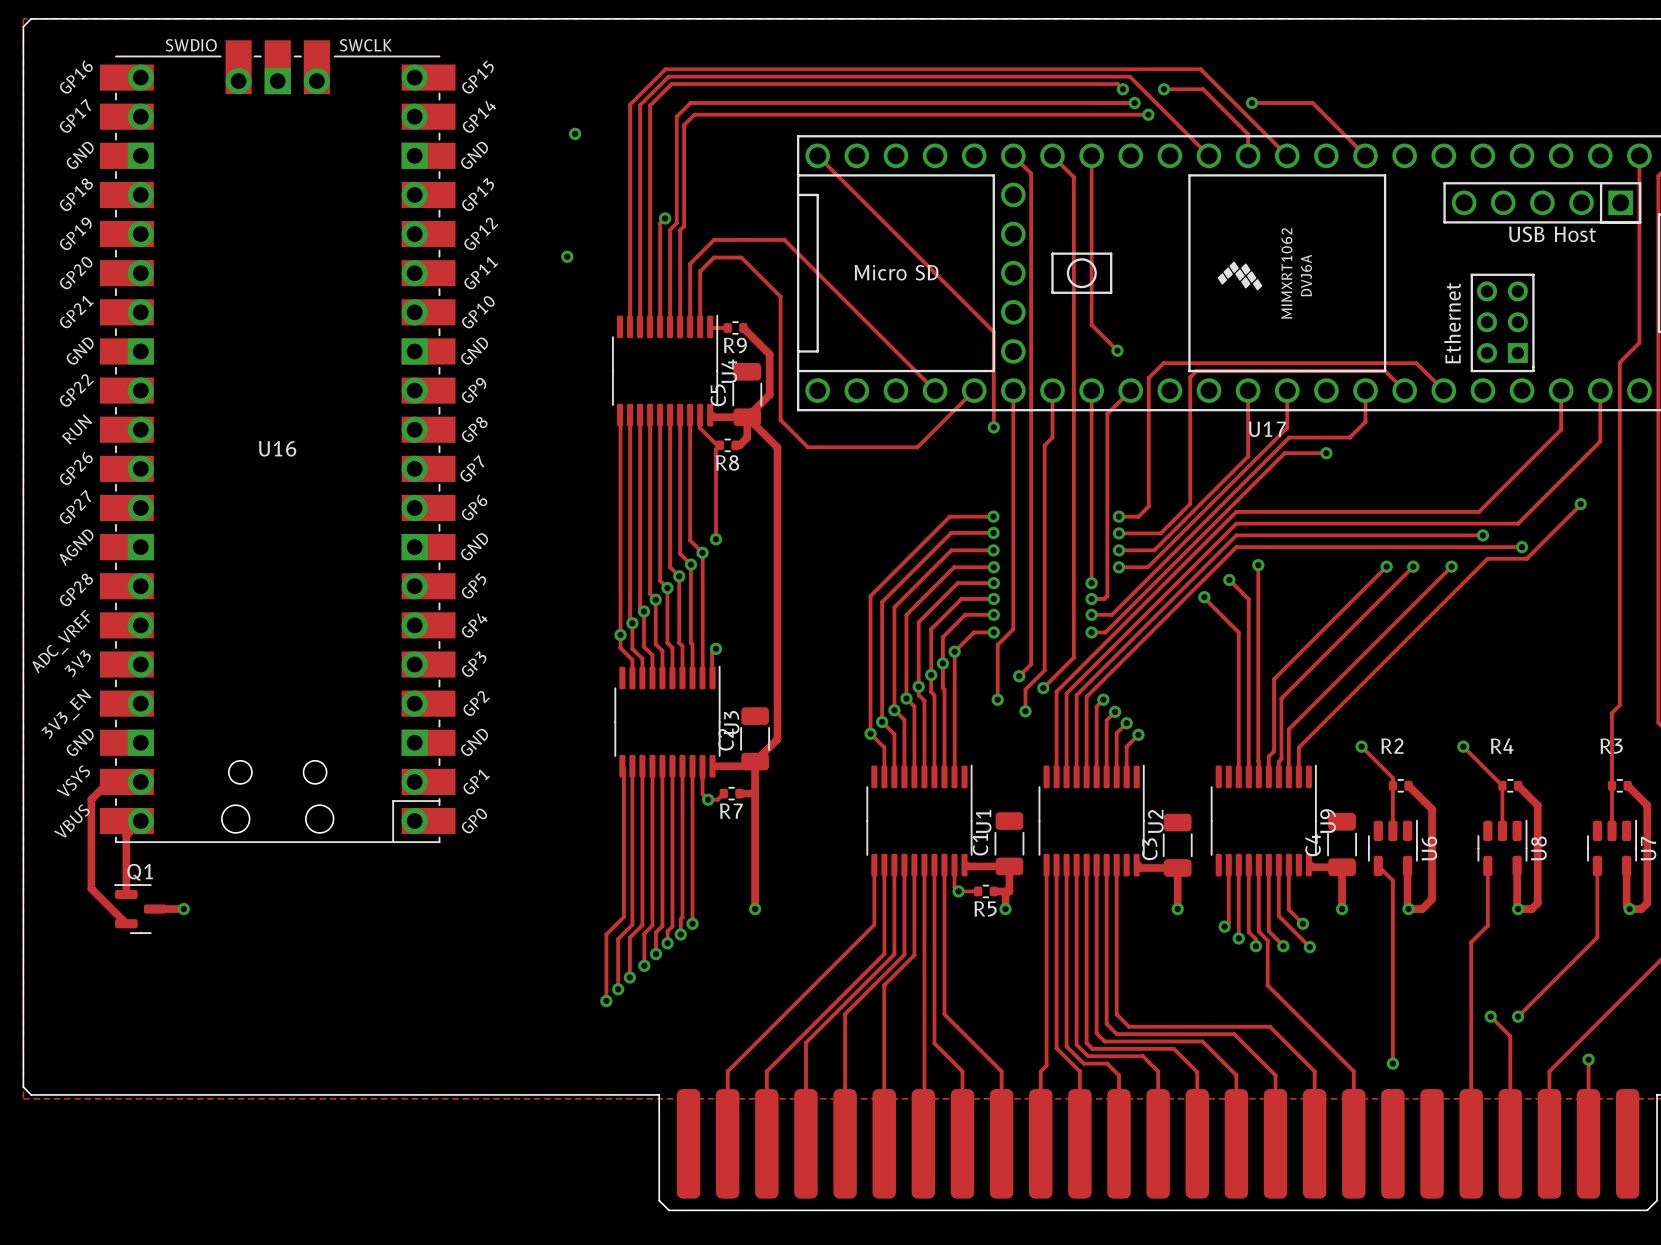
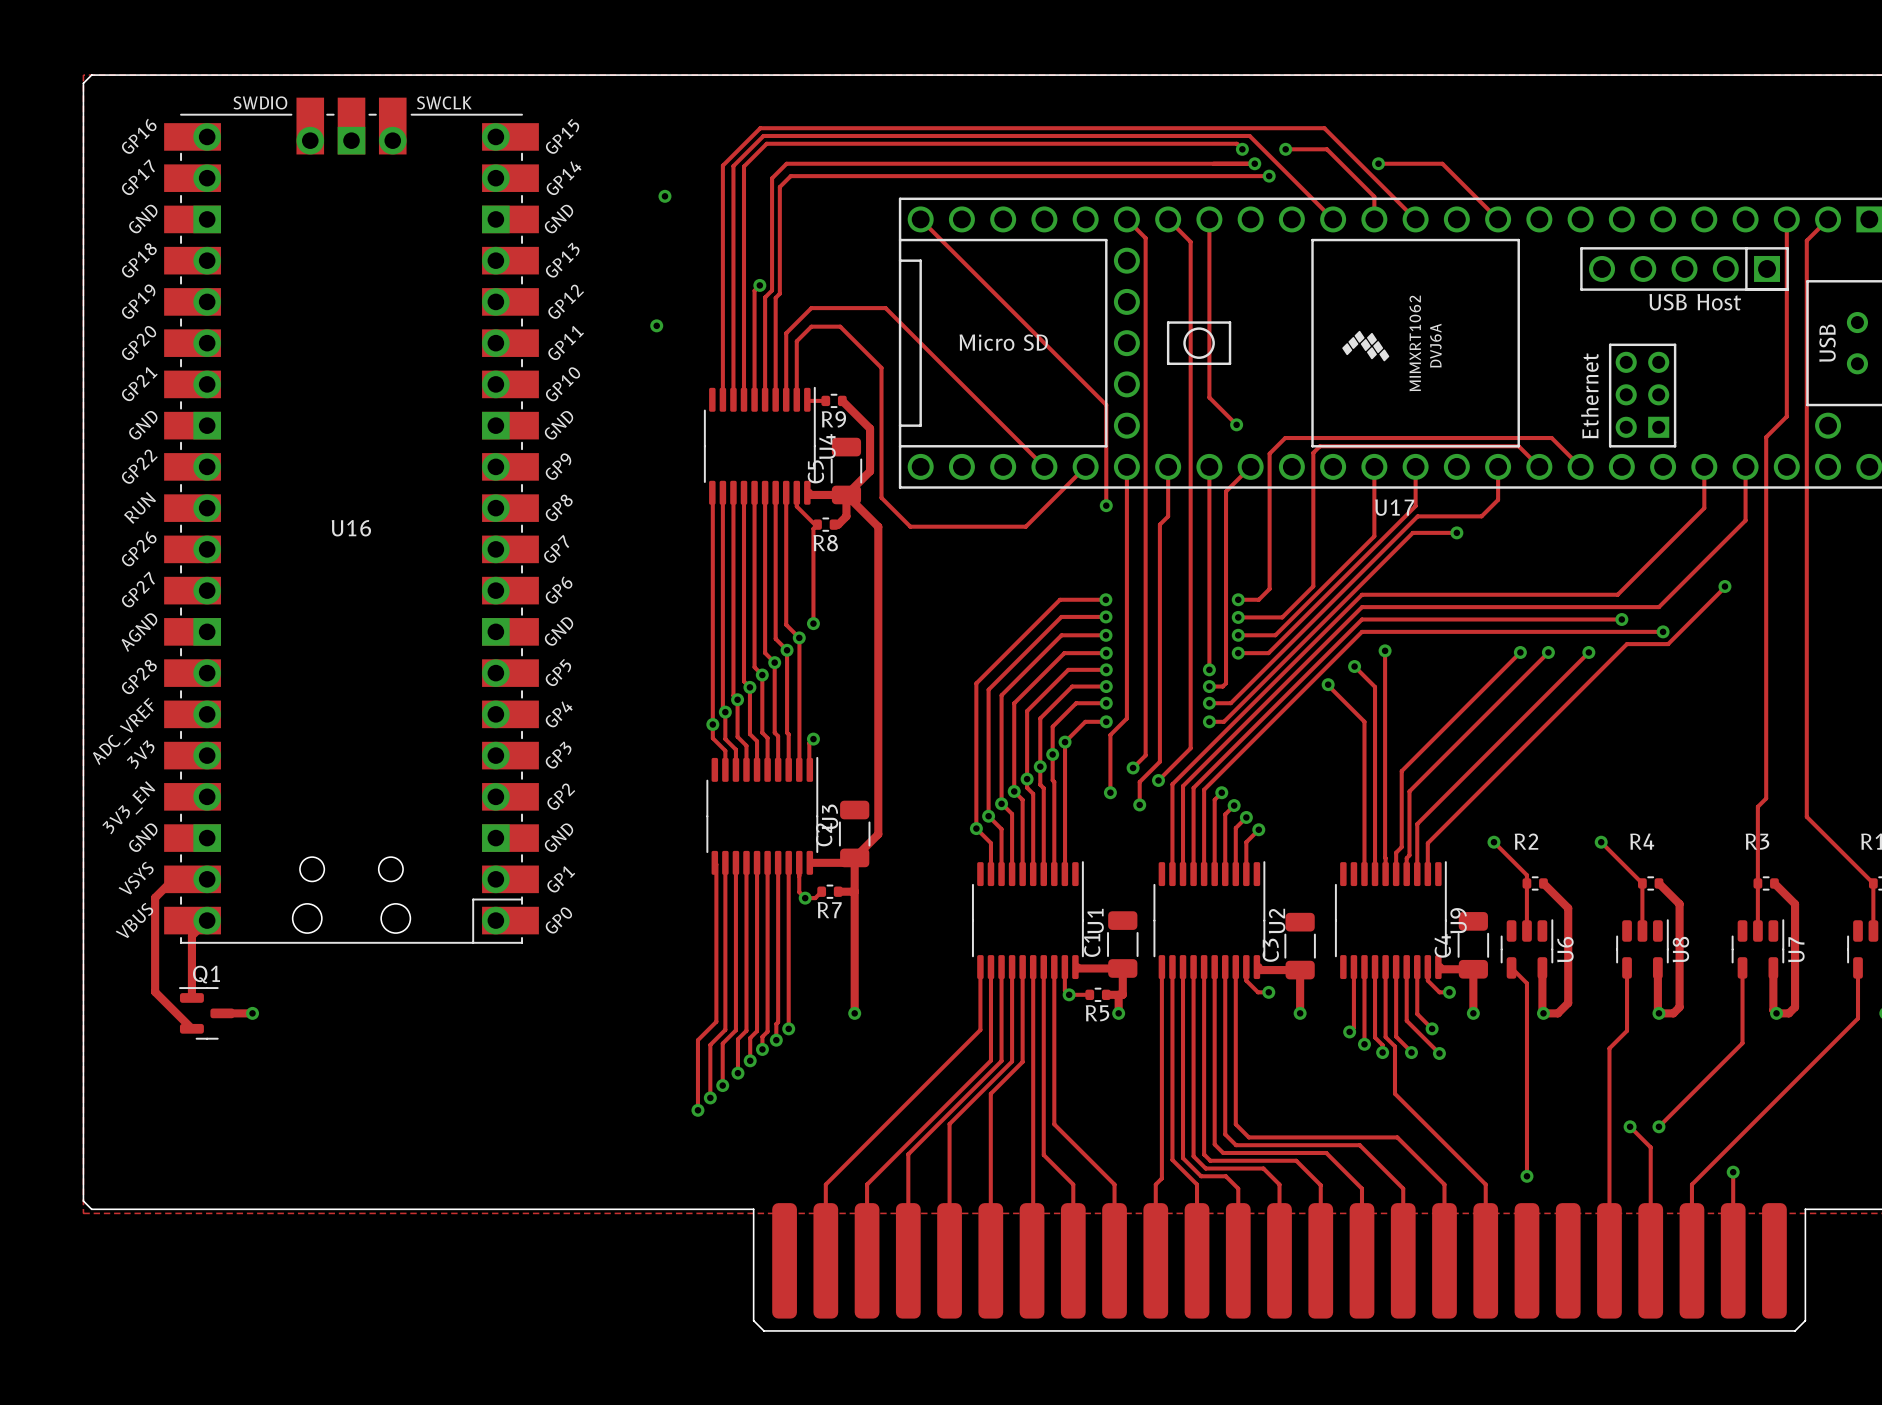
track: none -> (1246, 967) (1246, 980) (1258, 992) (1268, 992)
track: none -> (1427, 967) (1427, 980) (1439, 992) (1449, 992)
via: none -> (1268, 992)
via: none -> (1449, 992)

